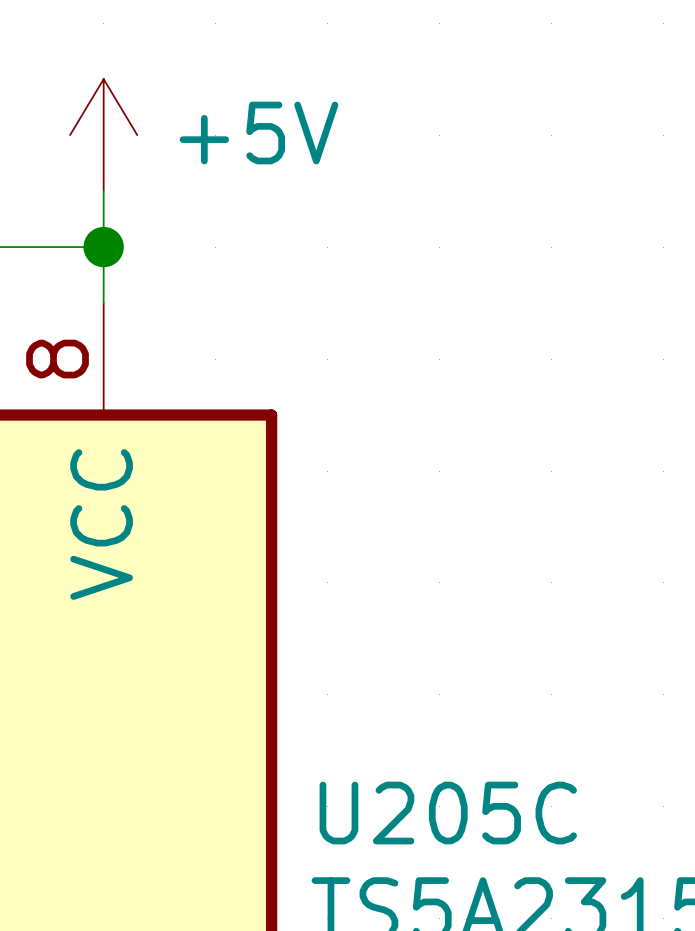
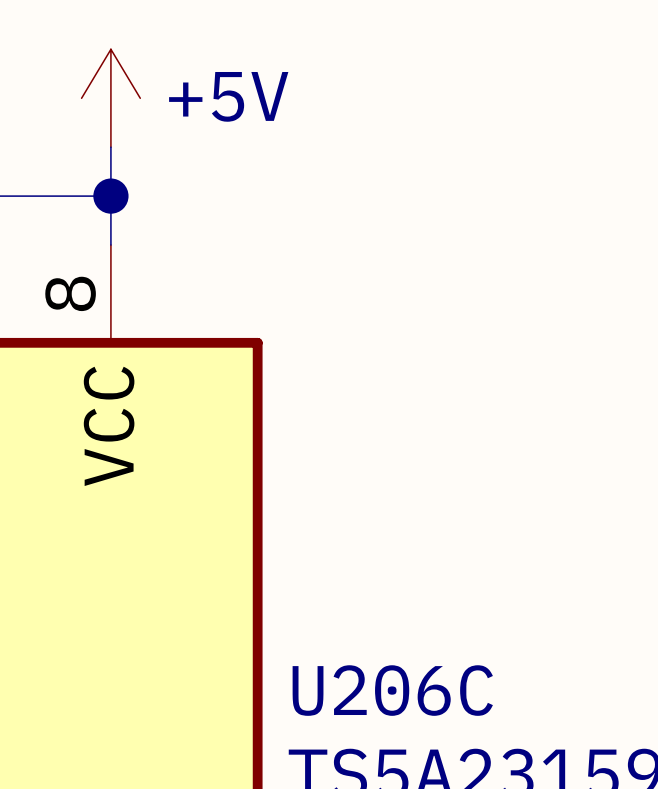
U205C name: U205C (448, 813) -> U206C (392, 690)

